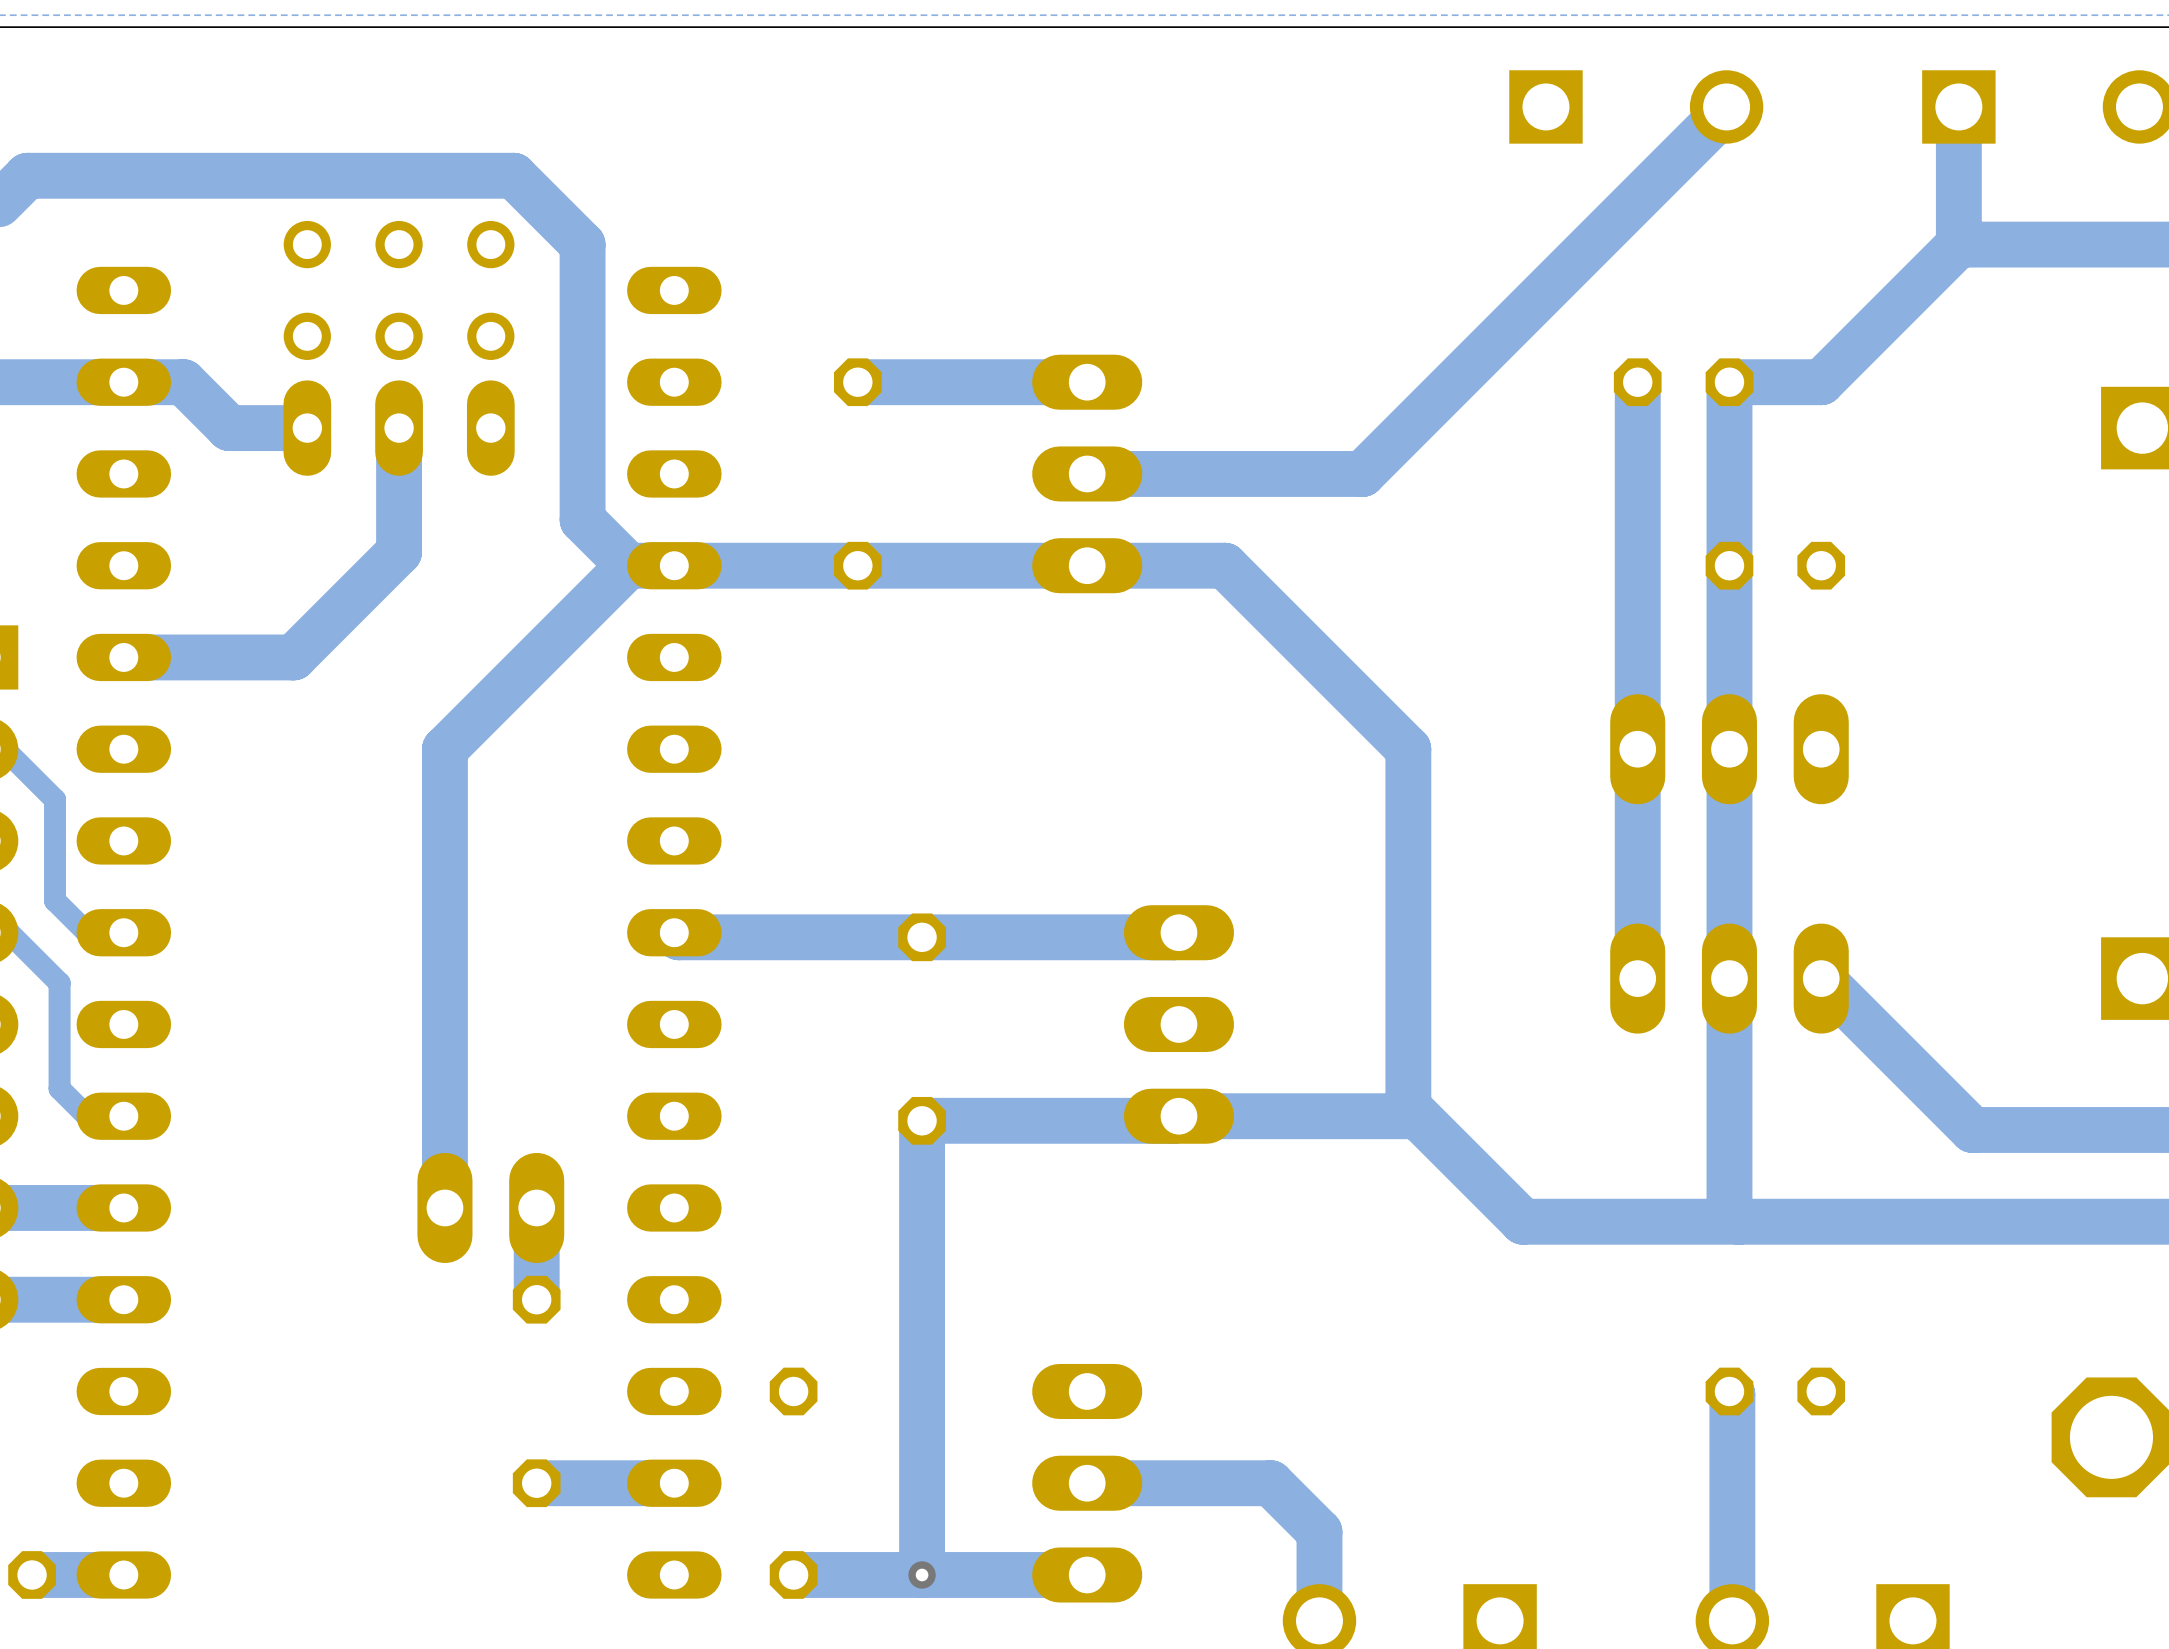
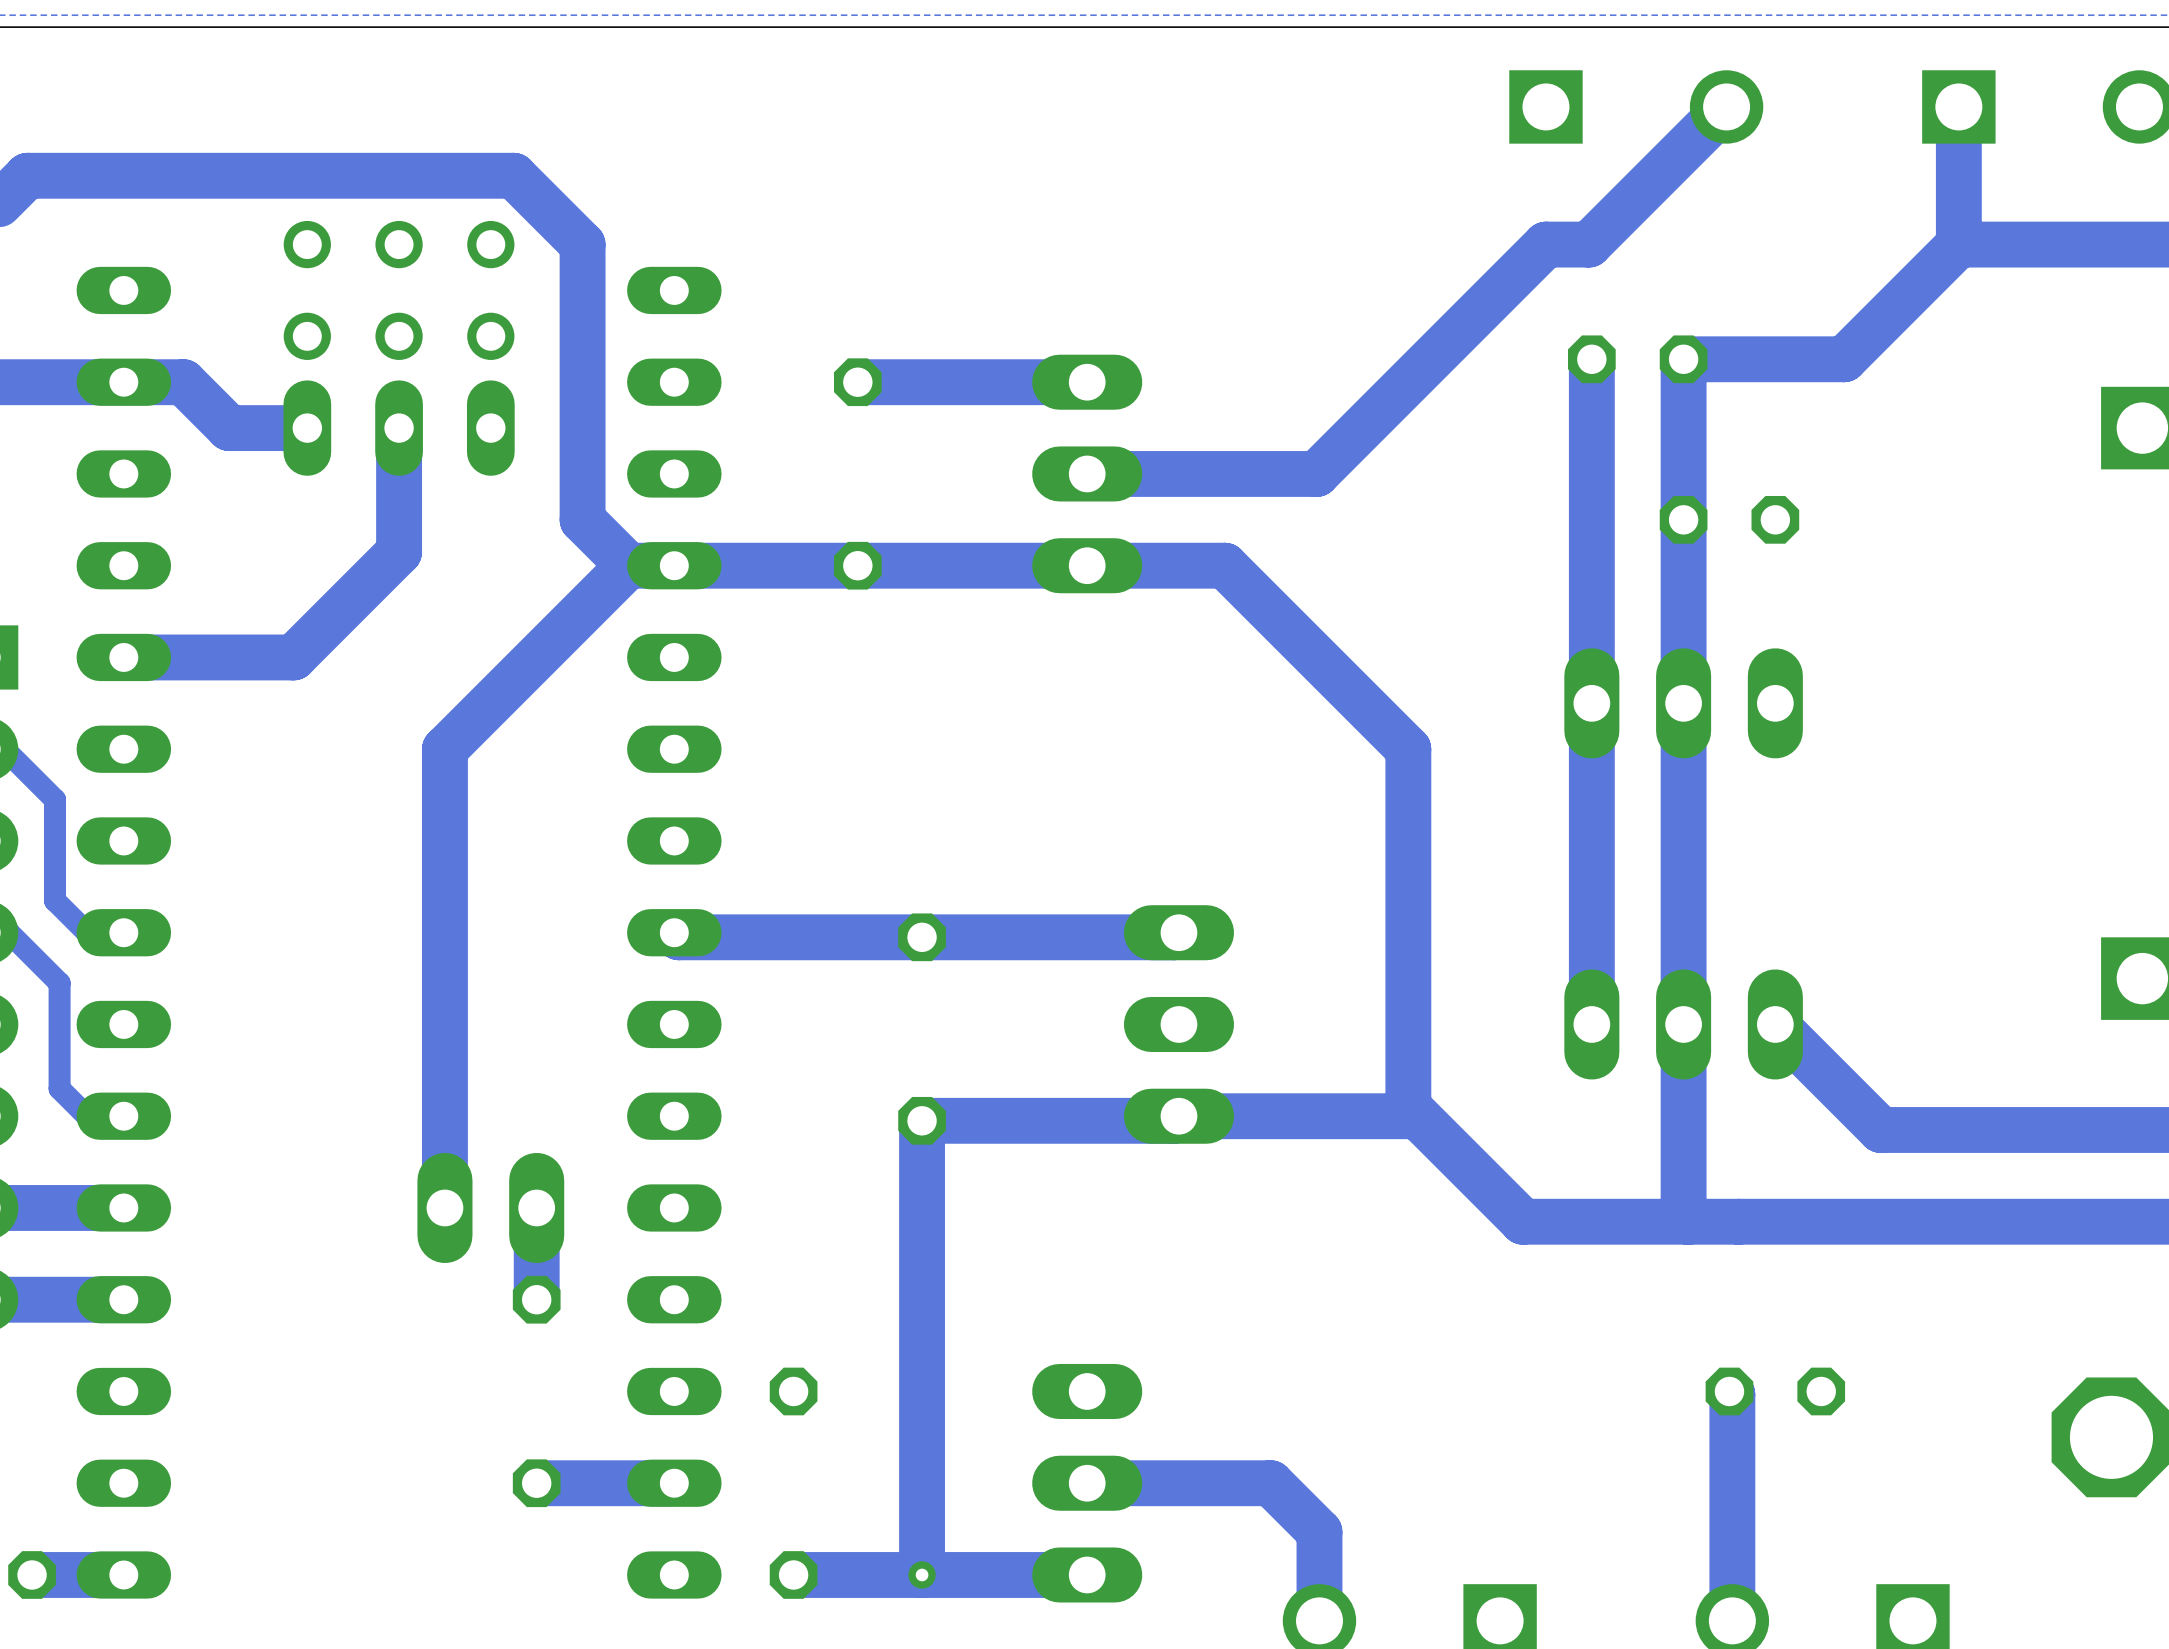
track: (1726, 106) (1726, 109) (1362, 473) (1316, 473) -> (1726, 106) (1588, 244) (1545, 244) (1316, 473)
track: none -> (1591, 359) (1591, 1024)
track: (1844, 359) (1821, 382) (1729, 382) (1729, 1212) (1738, 1221) -> (1844, 359) (1683, 359) (1683, 1217) (1688, 1221)
track: (1637, 382) (1637, 978) -> none
part position: (1683, 382) -> (1637, 359)
part position: (1775, 565) -> (1729, 519)
part position: (1729, 749) -> (1683, 703)
part position: (1729, 978) -> (1683, 1024)
track: (1821, 978) (1972, 1129) -> (1775, 1024) (1880, 1129) (1972, 1129)

